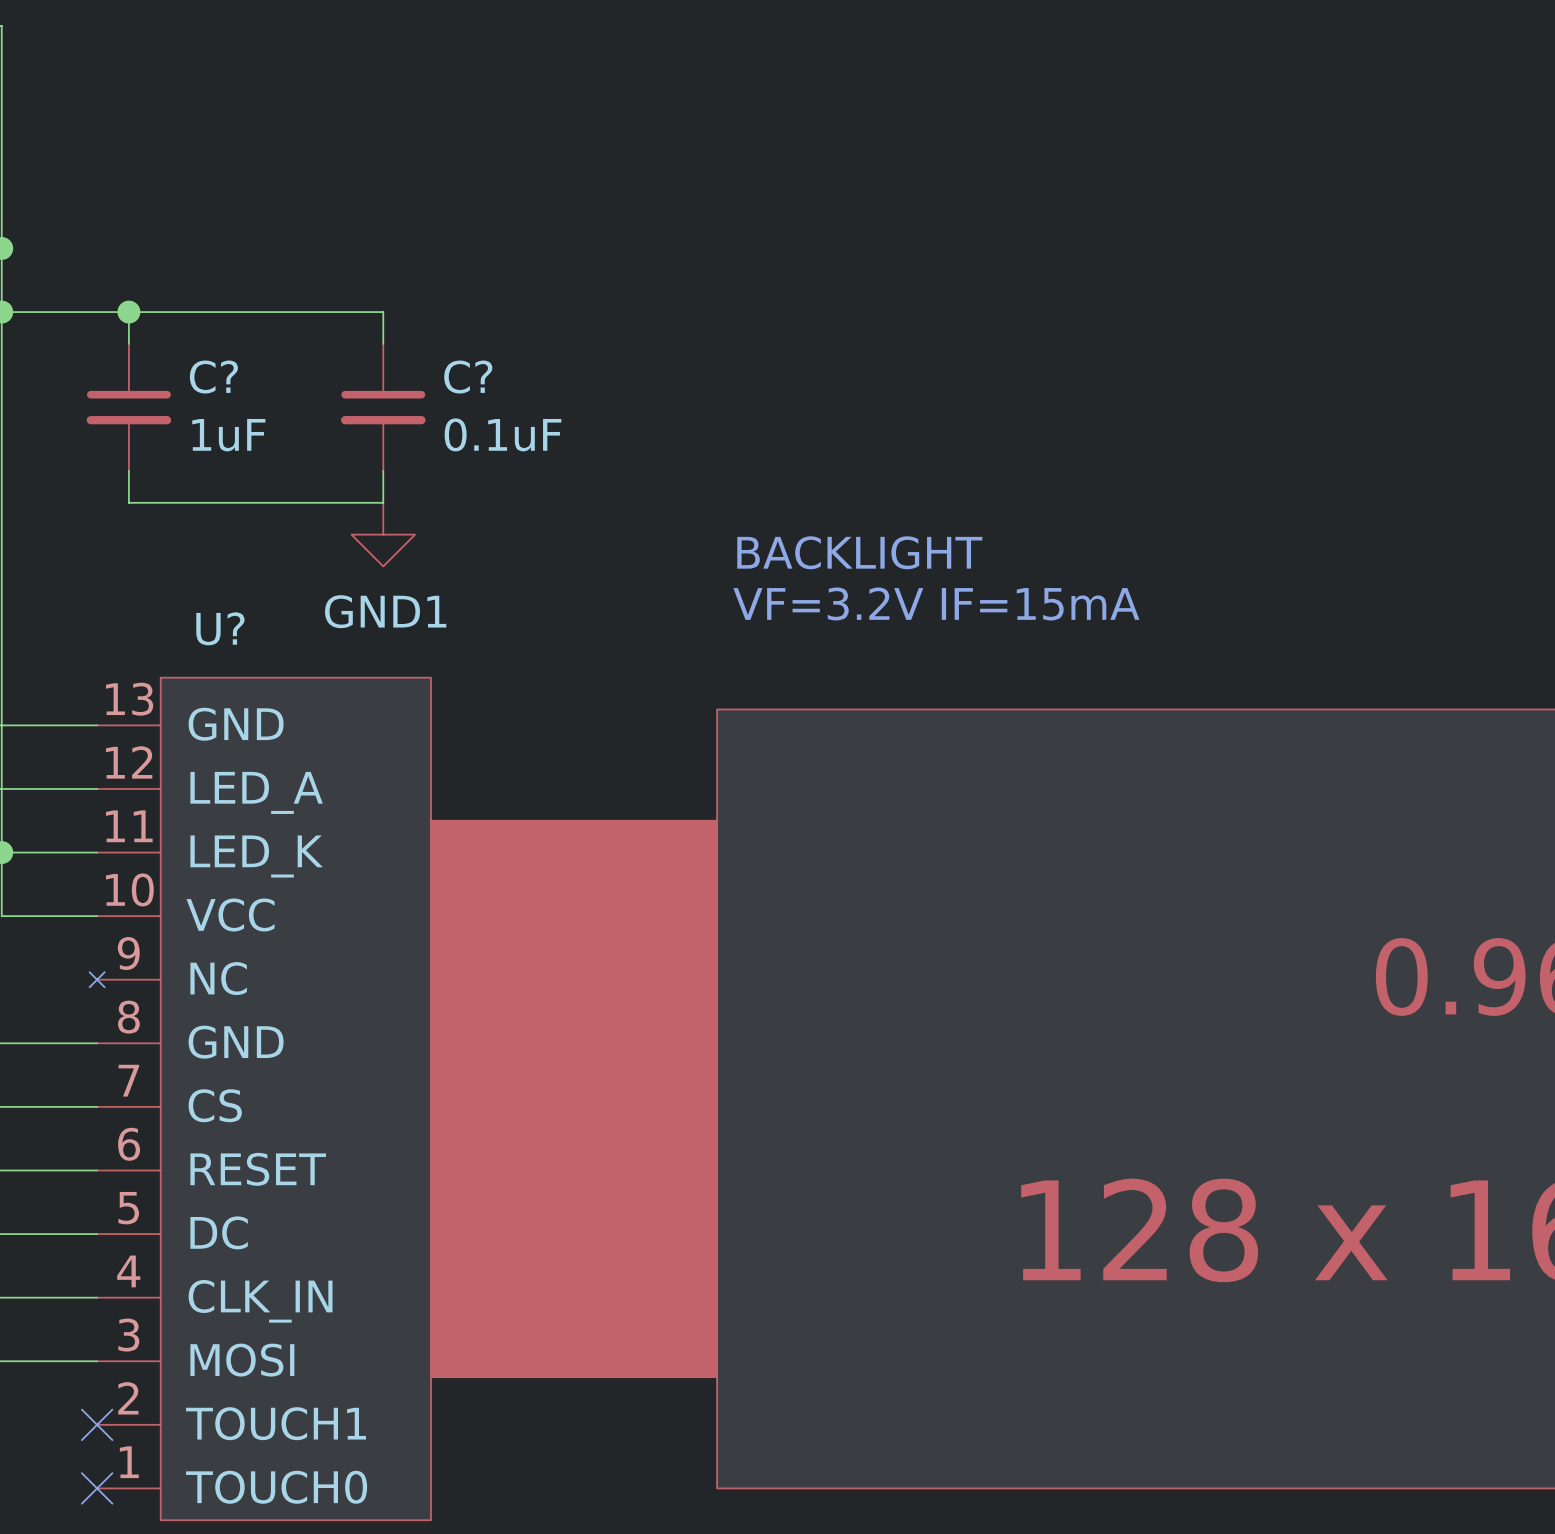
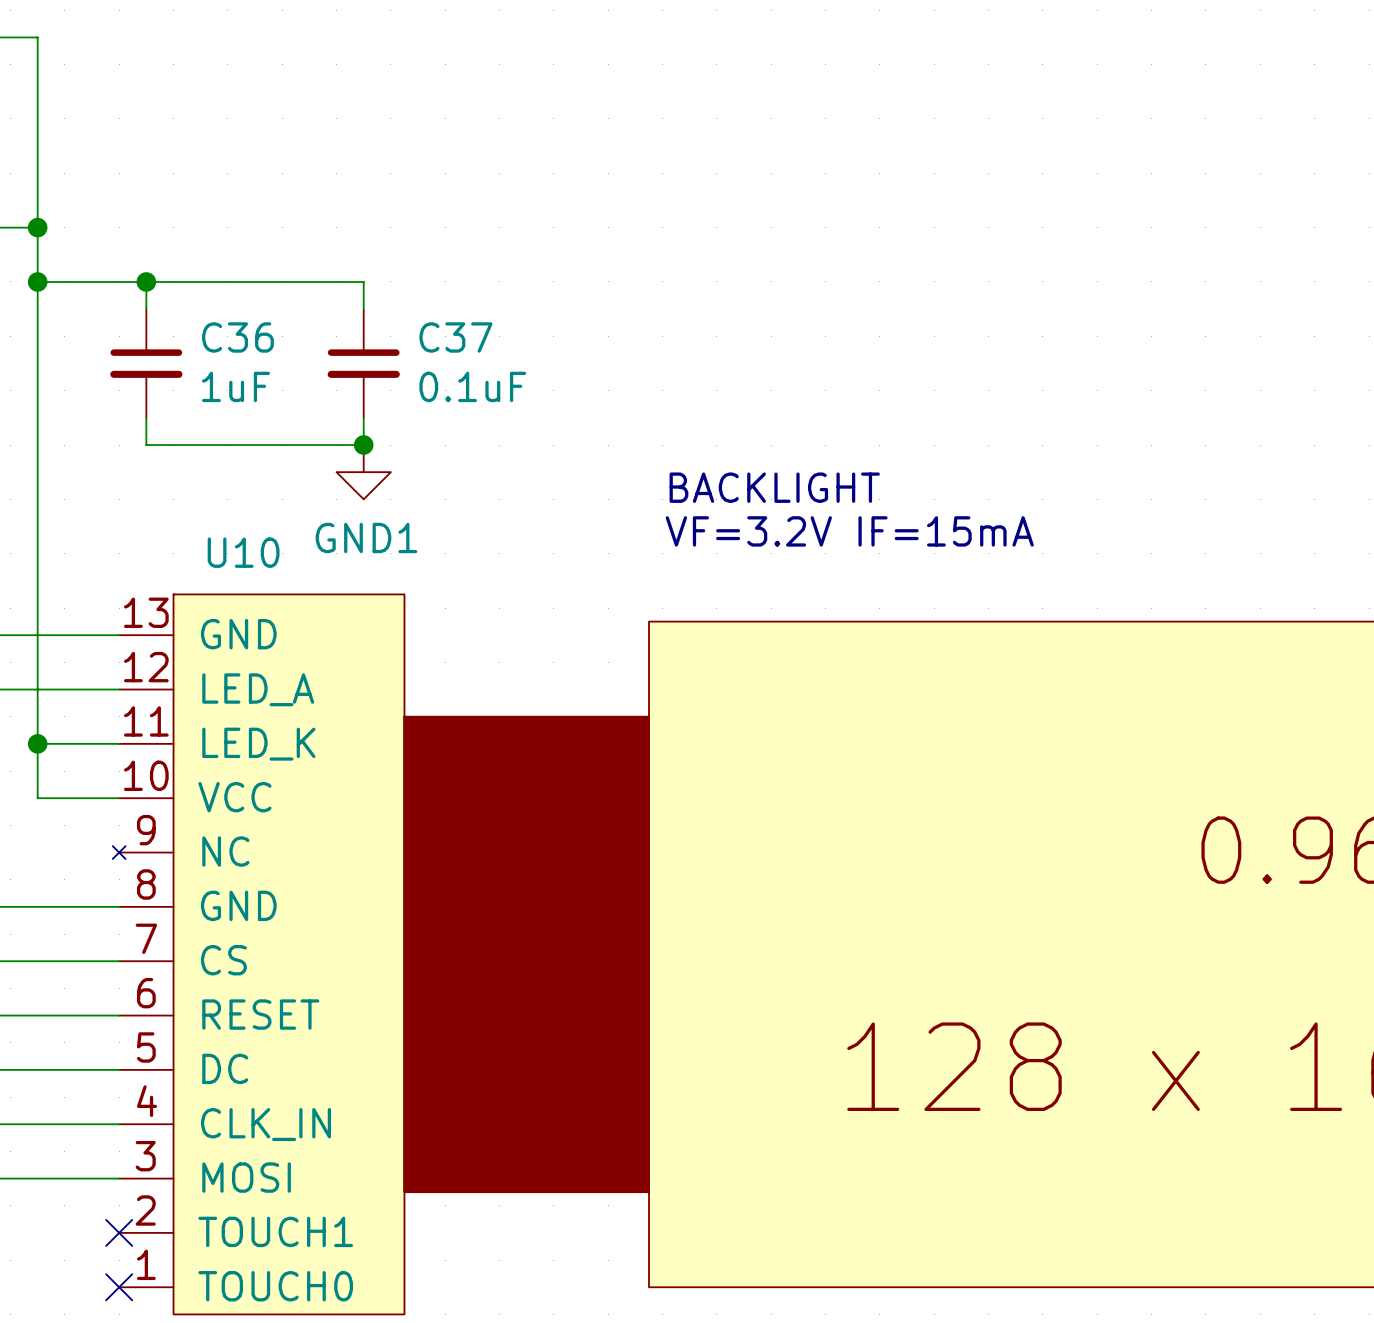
C? name: C? (213, 377) -> C36 (237, 337)
C? name: C? (468, 377) -> C37 (455, 337)
junction: none -> (363, 445)
U? name: U? (220, 628) -> U10 (243, 552)

